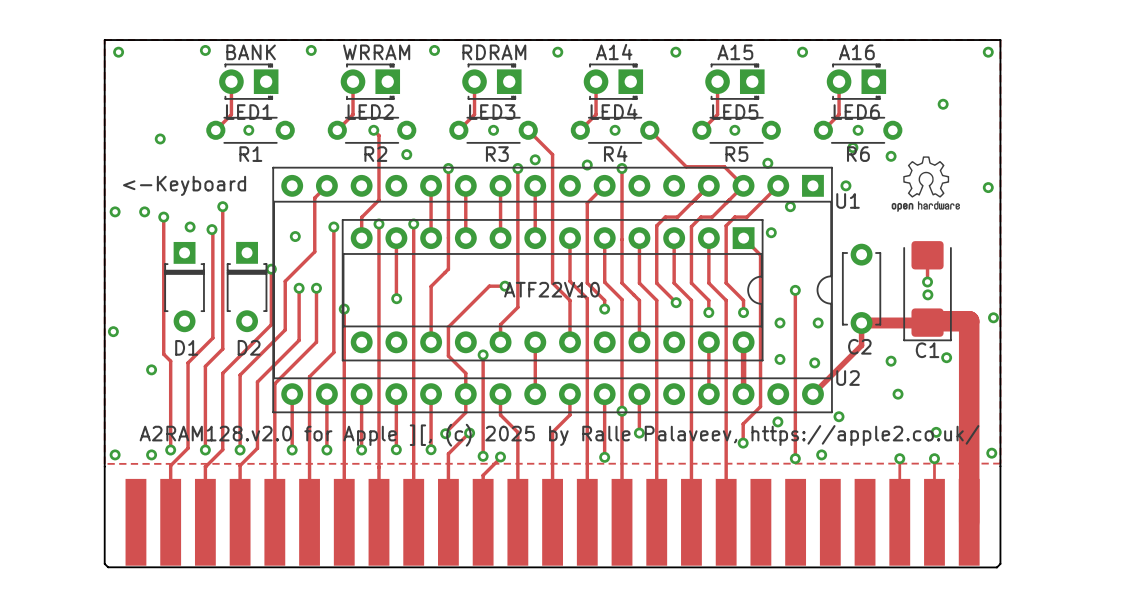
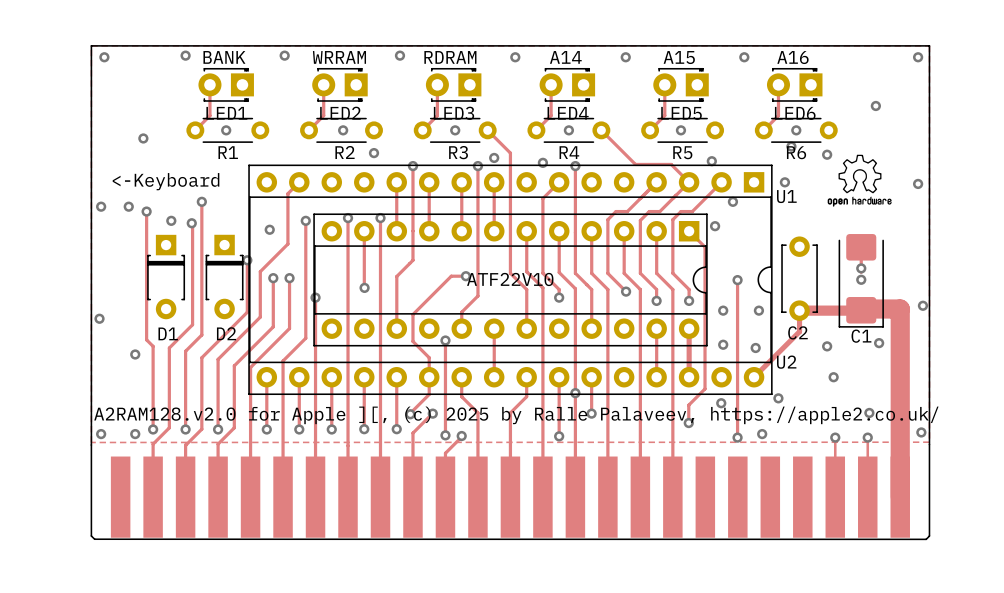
track: (373, 130) (378, 135) (378, 200) (361, 217) (361, 238) -> none
via: none -> (861, 268)
via: (927, 282) -> none
via: none -> (861, 279)
via: (927, 294) -> none

